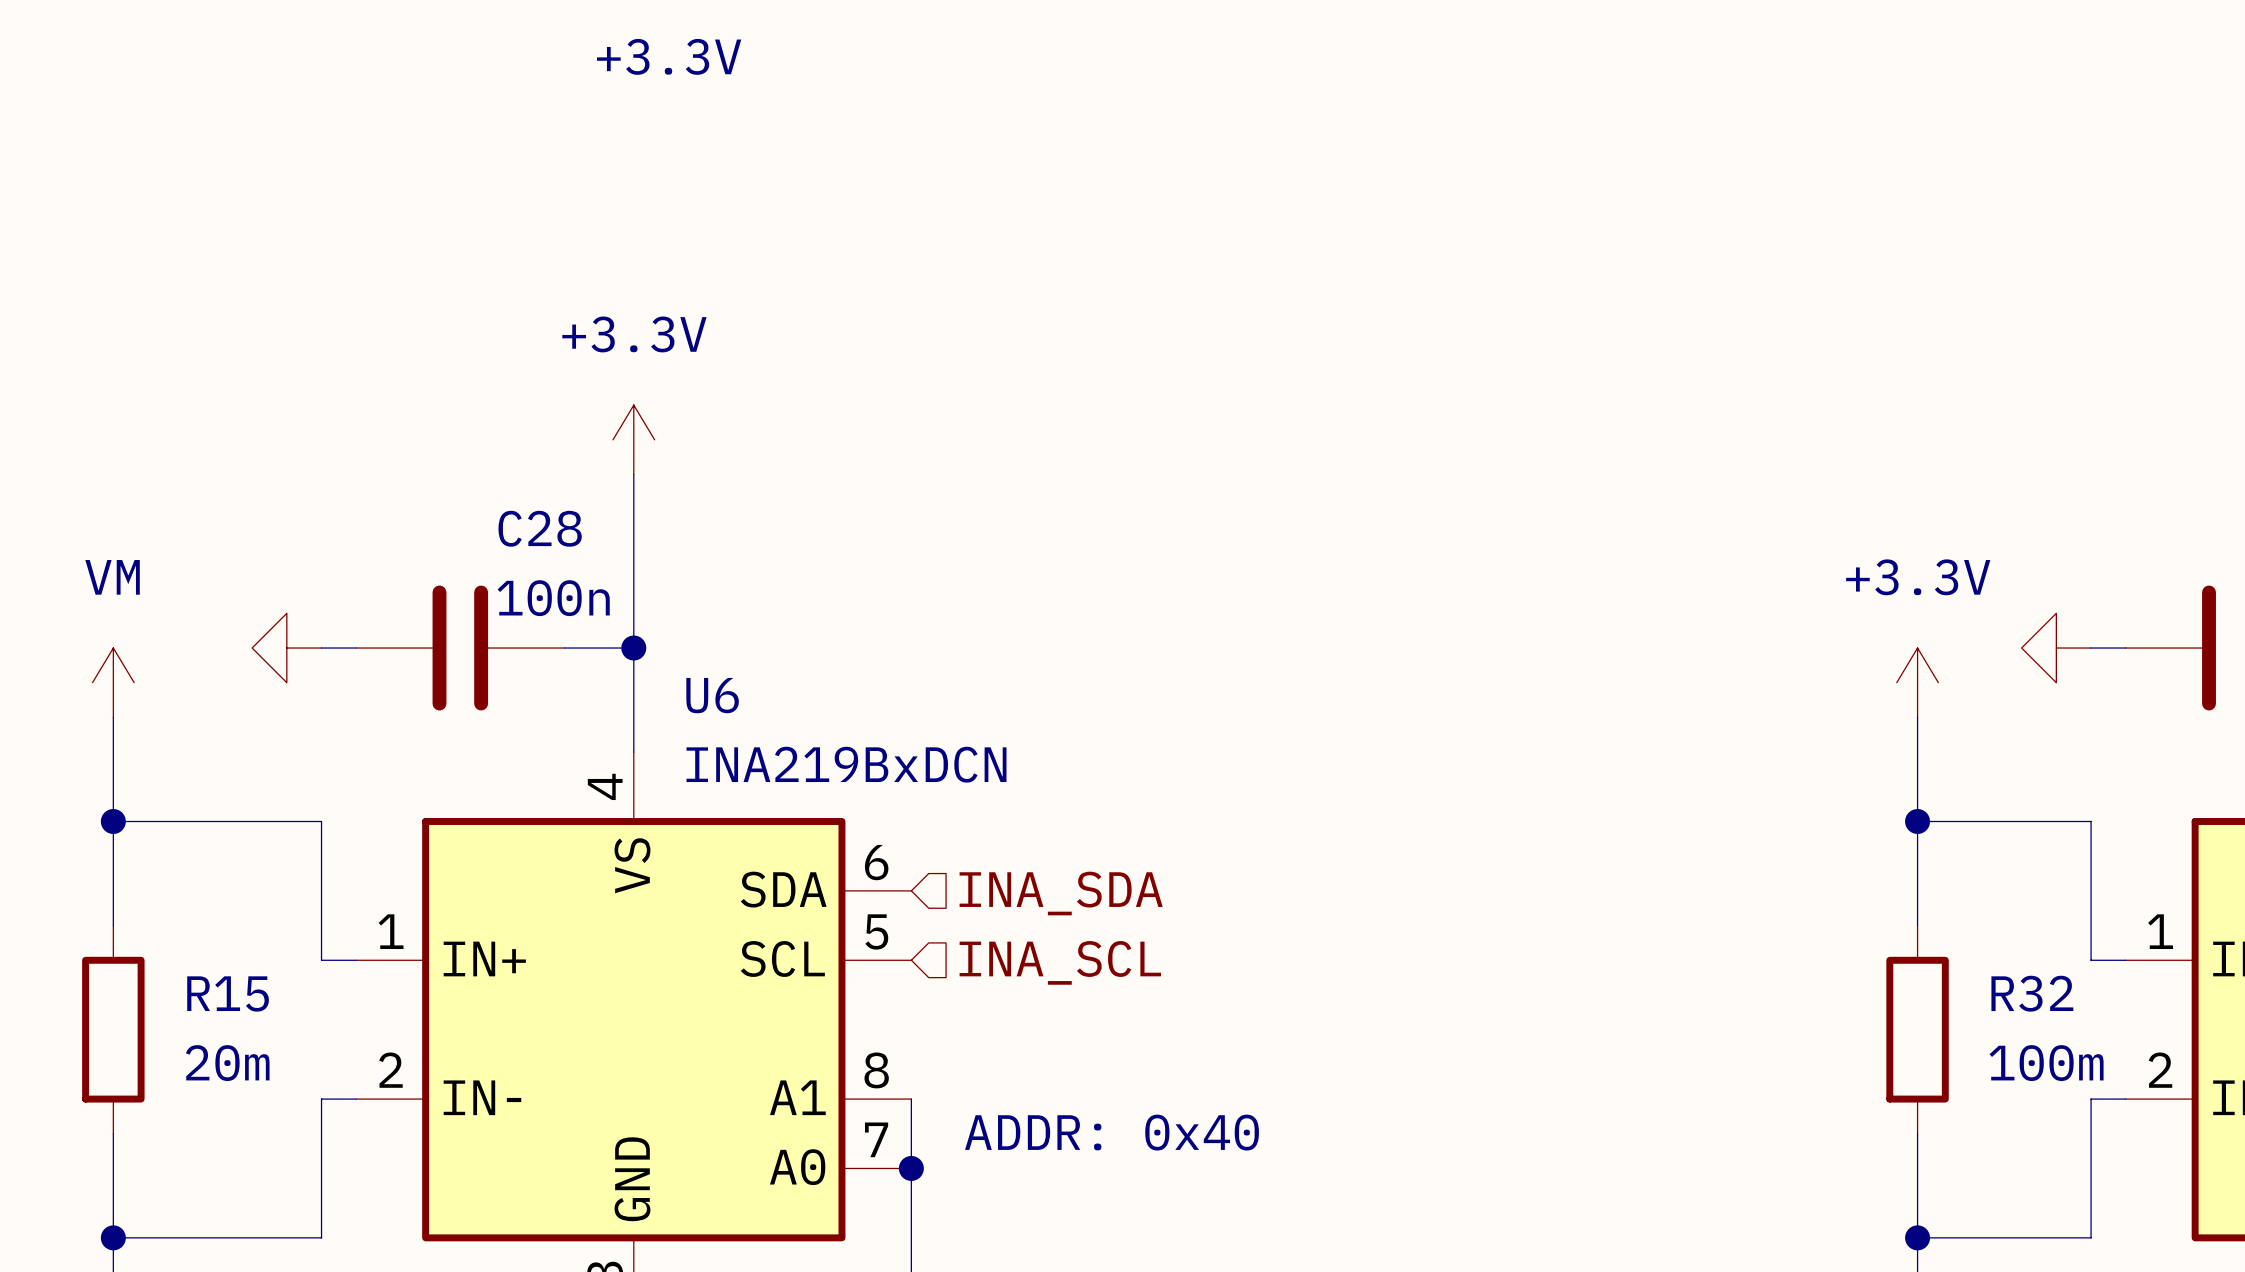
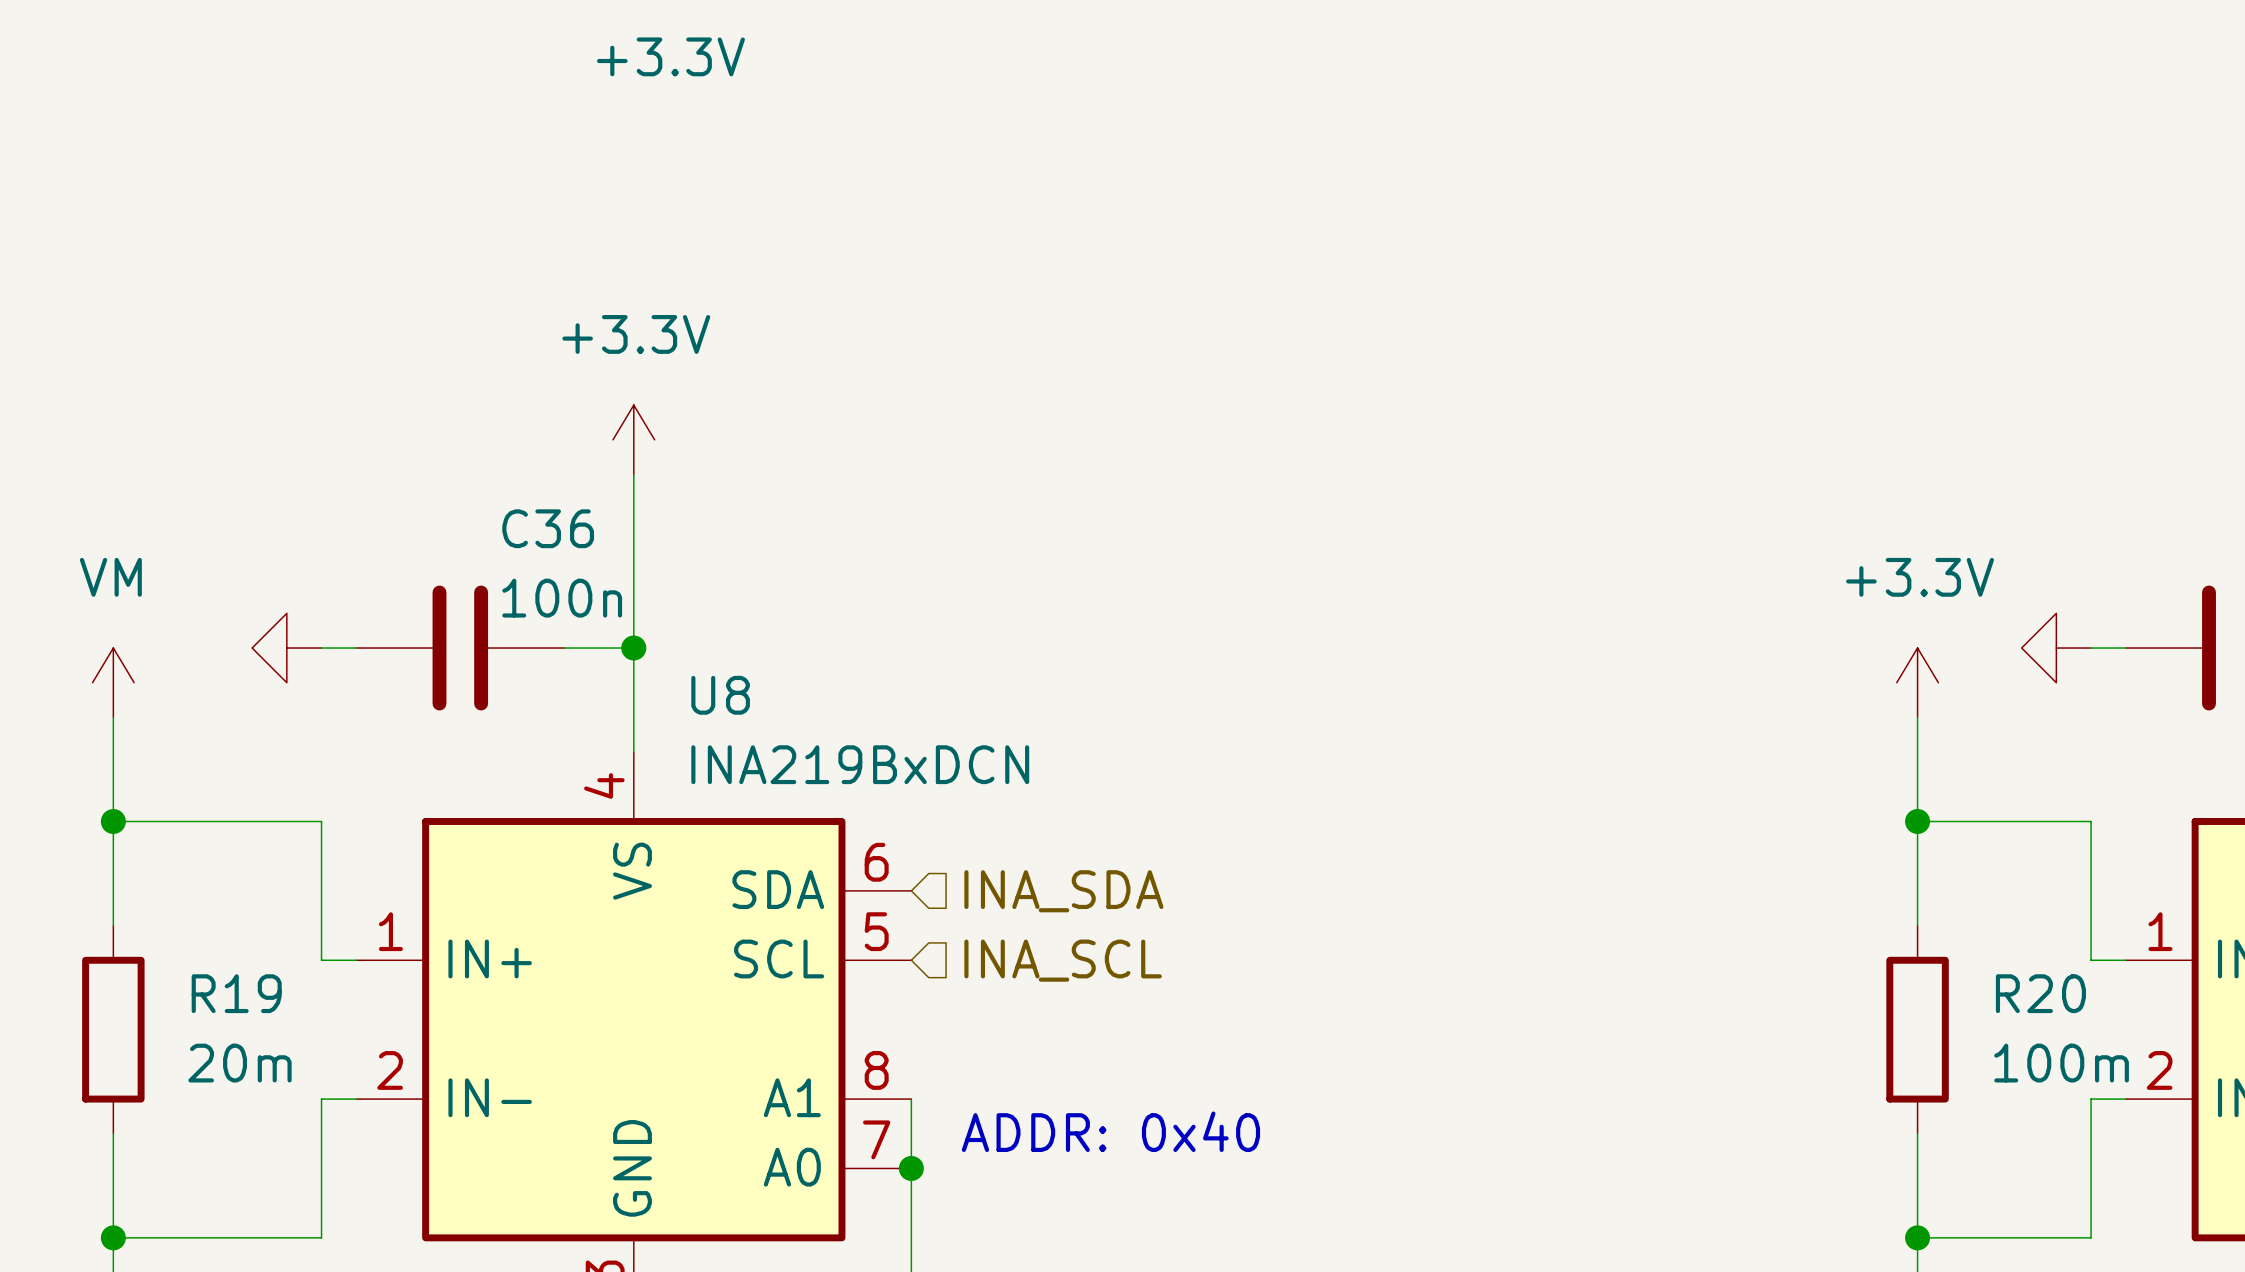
C28 name: C28 (540, 528) -> C36 (548, 528)
U6 name: U6 (712, 695) -> U8 (720, 695)
R15 name: R15 (228, 993) -> R19 (236, 993)
R32 name: R32 (2032, 993) -> R20 (2040, 993)

